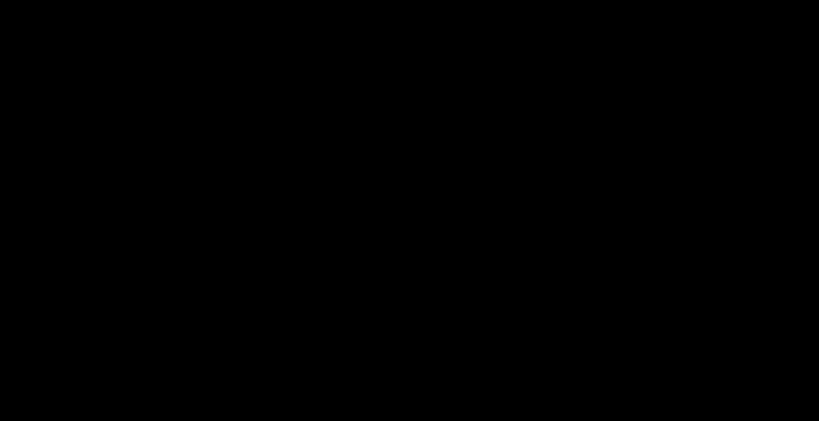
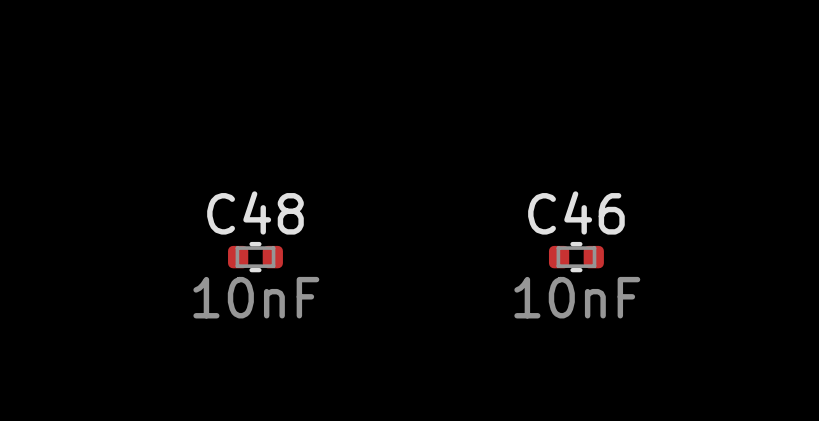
C48: none -> 10nF (255, 257)
C46: none -> 10nF (576, 257)

